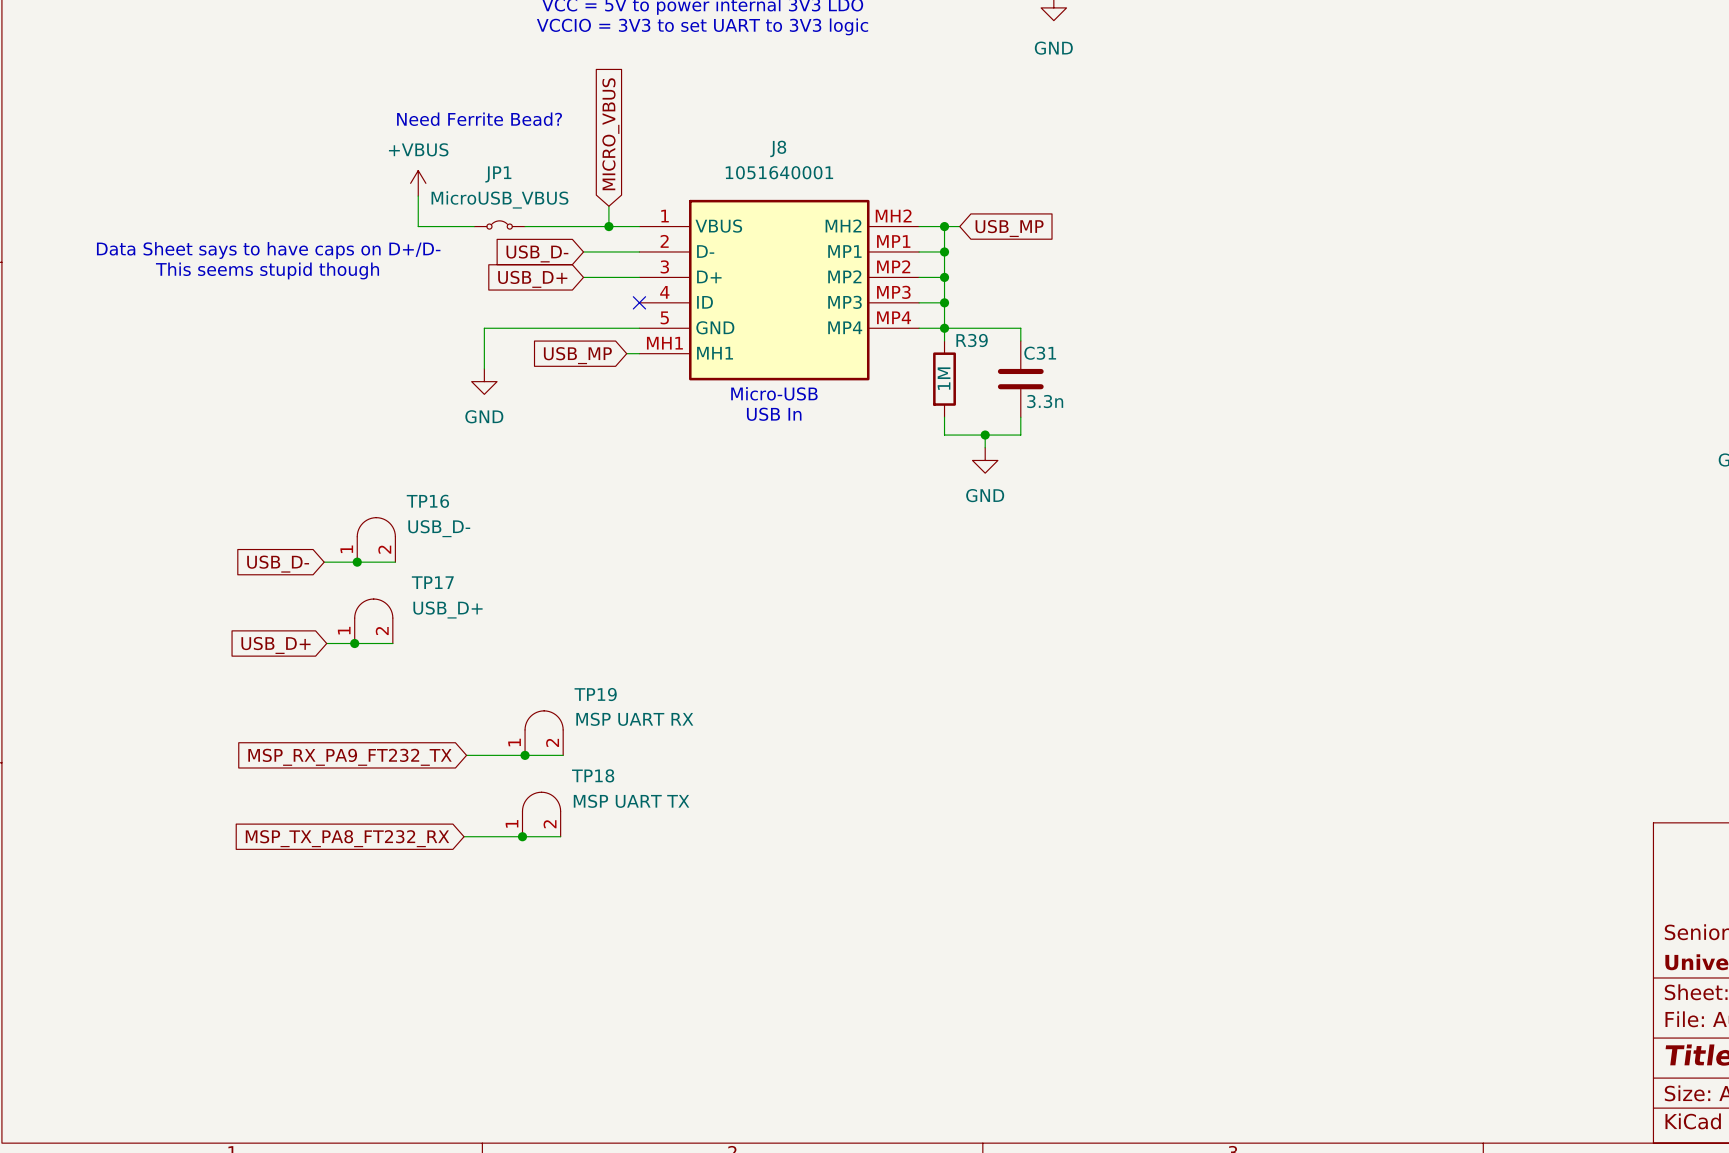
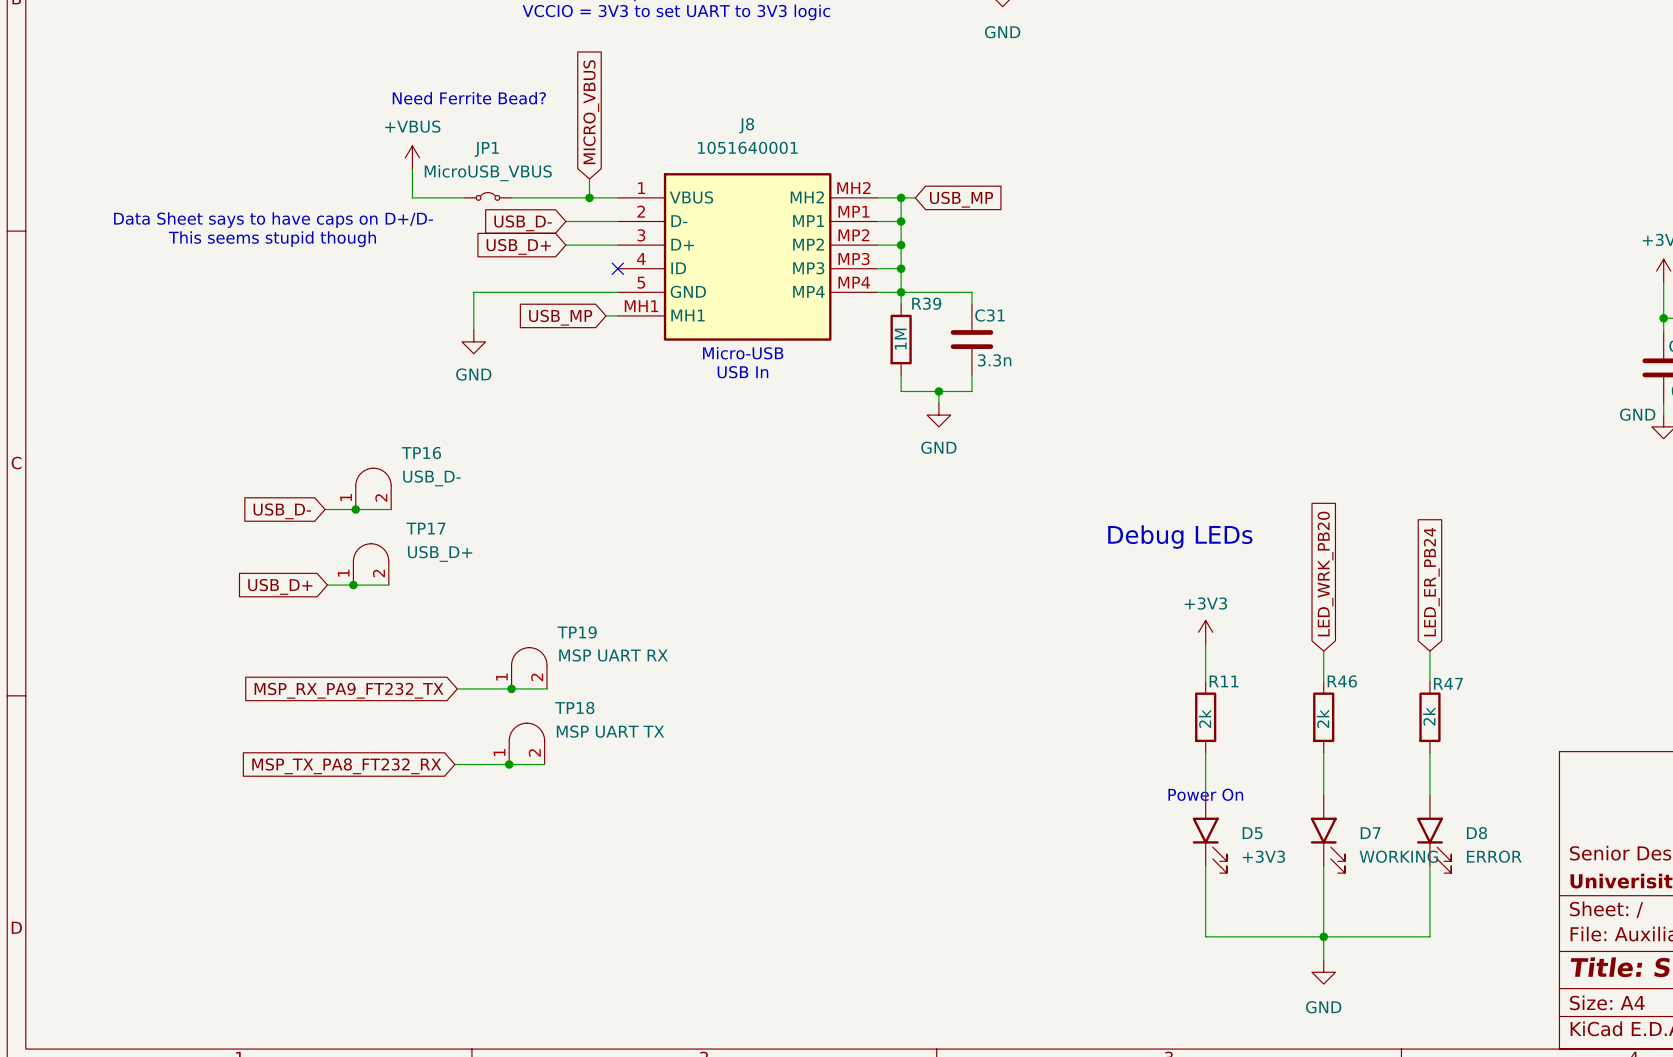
text: none -> Debug LEDs (1180, 537)
global label: none -> LED_WRK_PB20 (1325, 574)
global label: none -> LED_ER_PB24 (1431, 582)
power symbol: none -> +3V3 (1205, 632)
wire: none -> (1205, 644) (1205, 681)
wire: none -> (1323, 651) (1323, 681)
wire: none -> (1429, 651) (1429, 681)
R11: none -> 2k (1205, 717)
R46: none -> 2k (1323, 717)
R47: none -> 2k (1429, 717)
wire: none -> (1205, 752) (1205, 795)
wire: none -> (1323, 752) (1323, 795)
wire: none -> (1429, 752) (1429, 795)
text: none -> Power On (1205, 794)
D5: none -> +3V3 (1209, 834)
D7: none -> WORKING (1327, 834)
D8: none -> ERROR (1434, 834)
wire: none -> (1205, 866) (1205, 936) (1429, 936) (1429, 866)
wire: none -> (1323, 866) (1323, 960)
junction: none -> (1323, 936)
power symbol: none -> GND (1323, 972)

